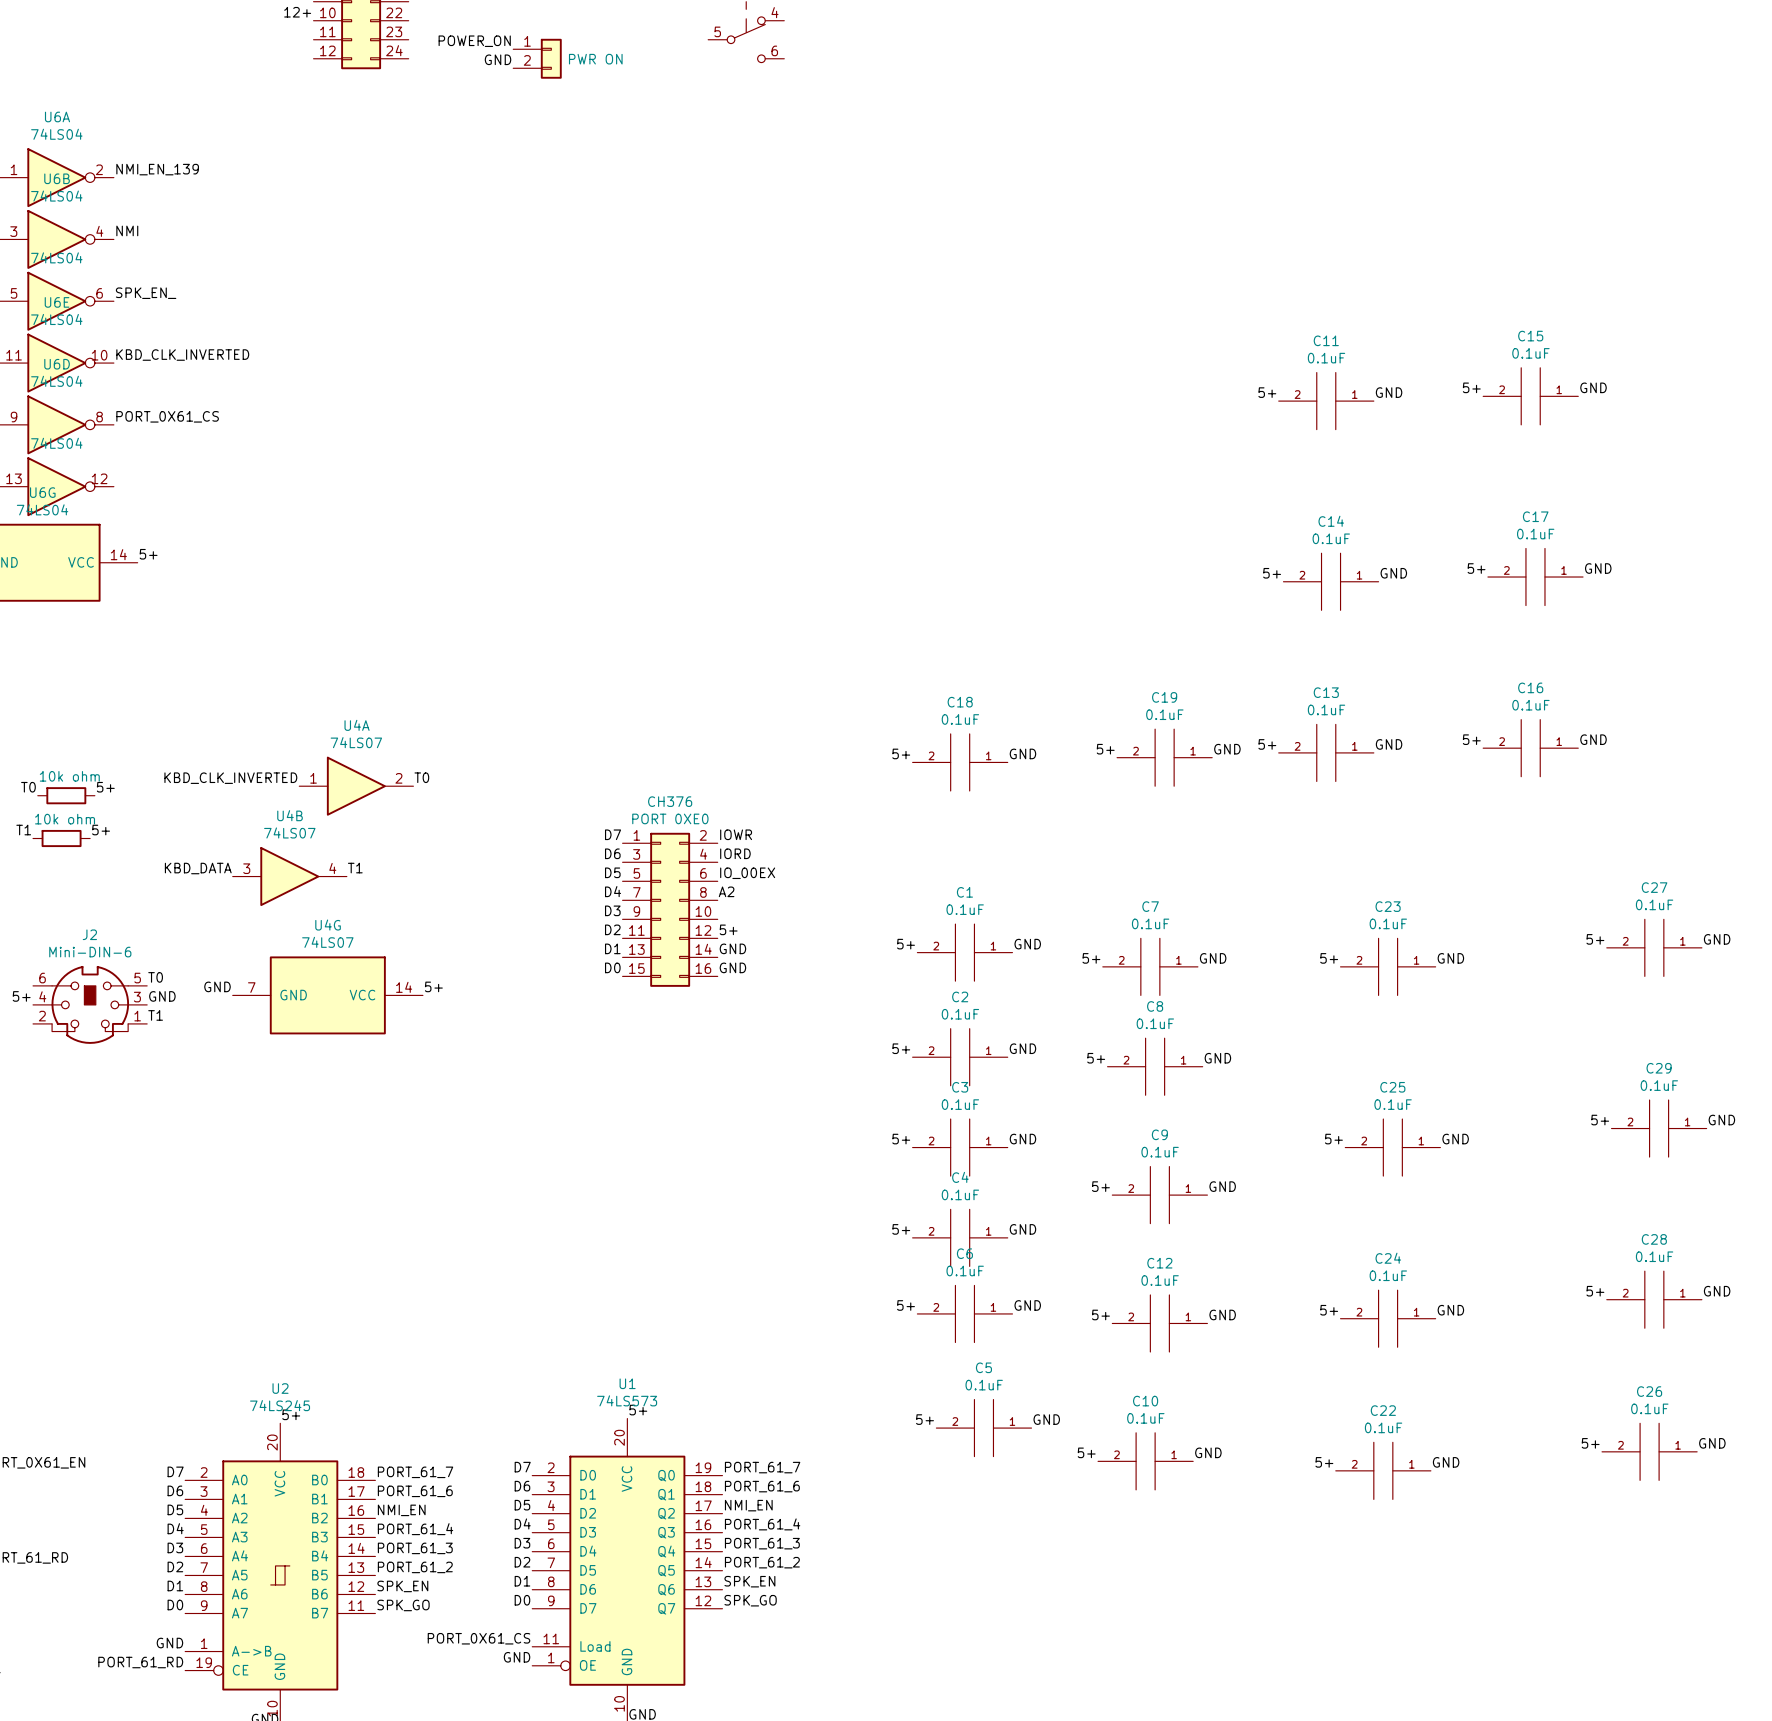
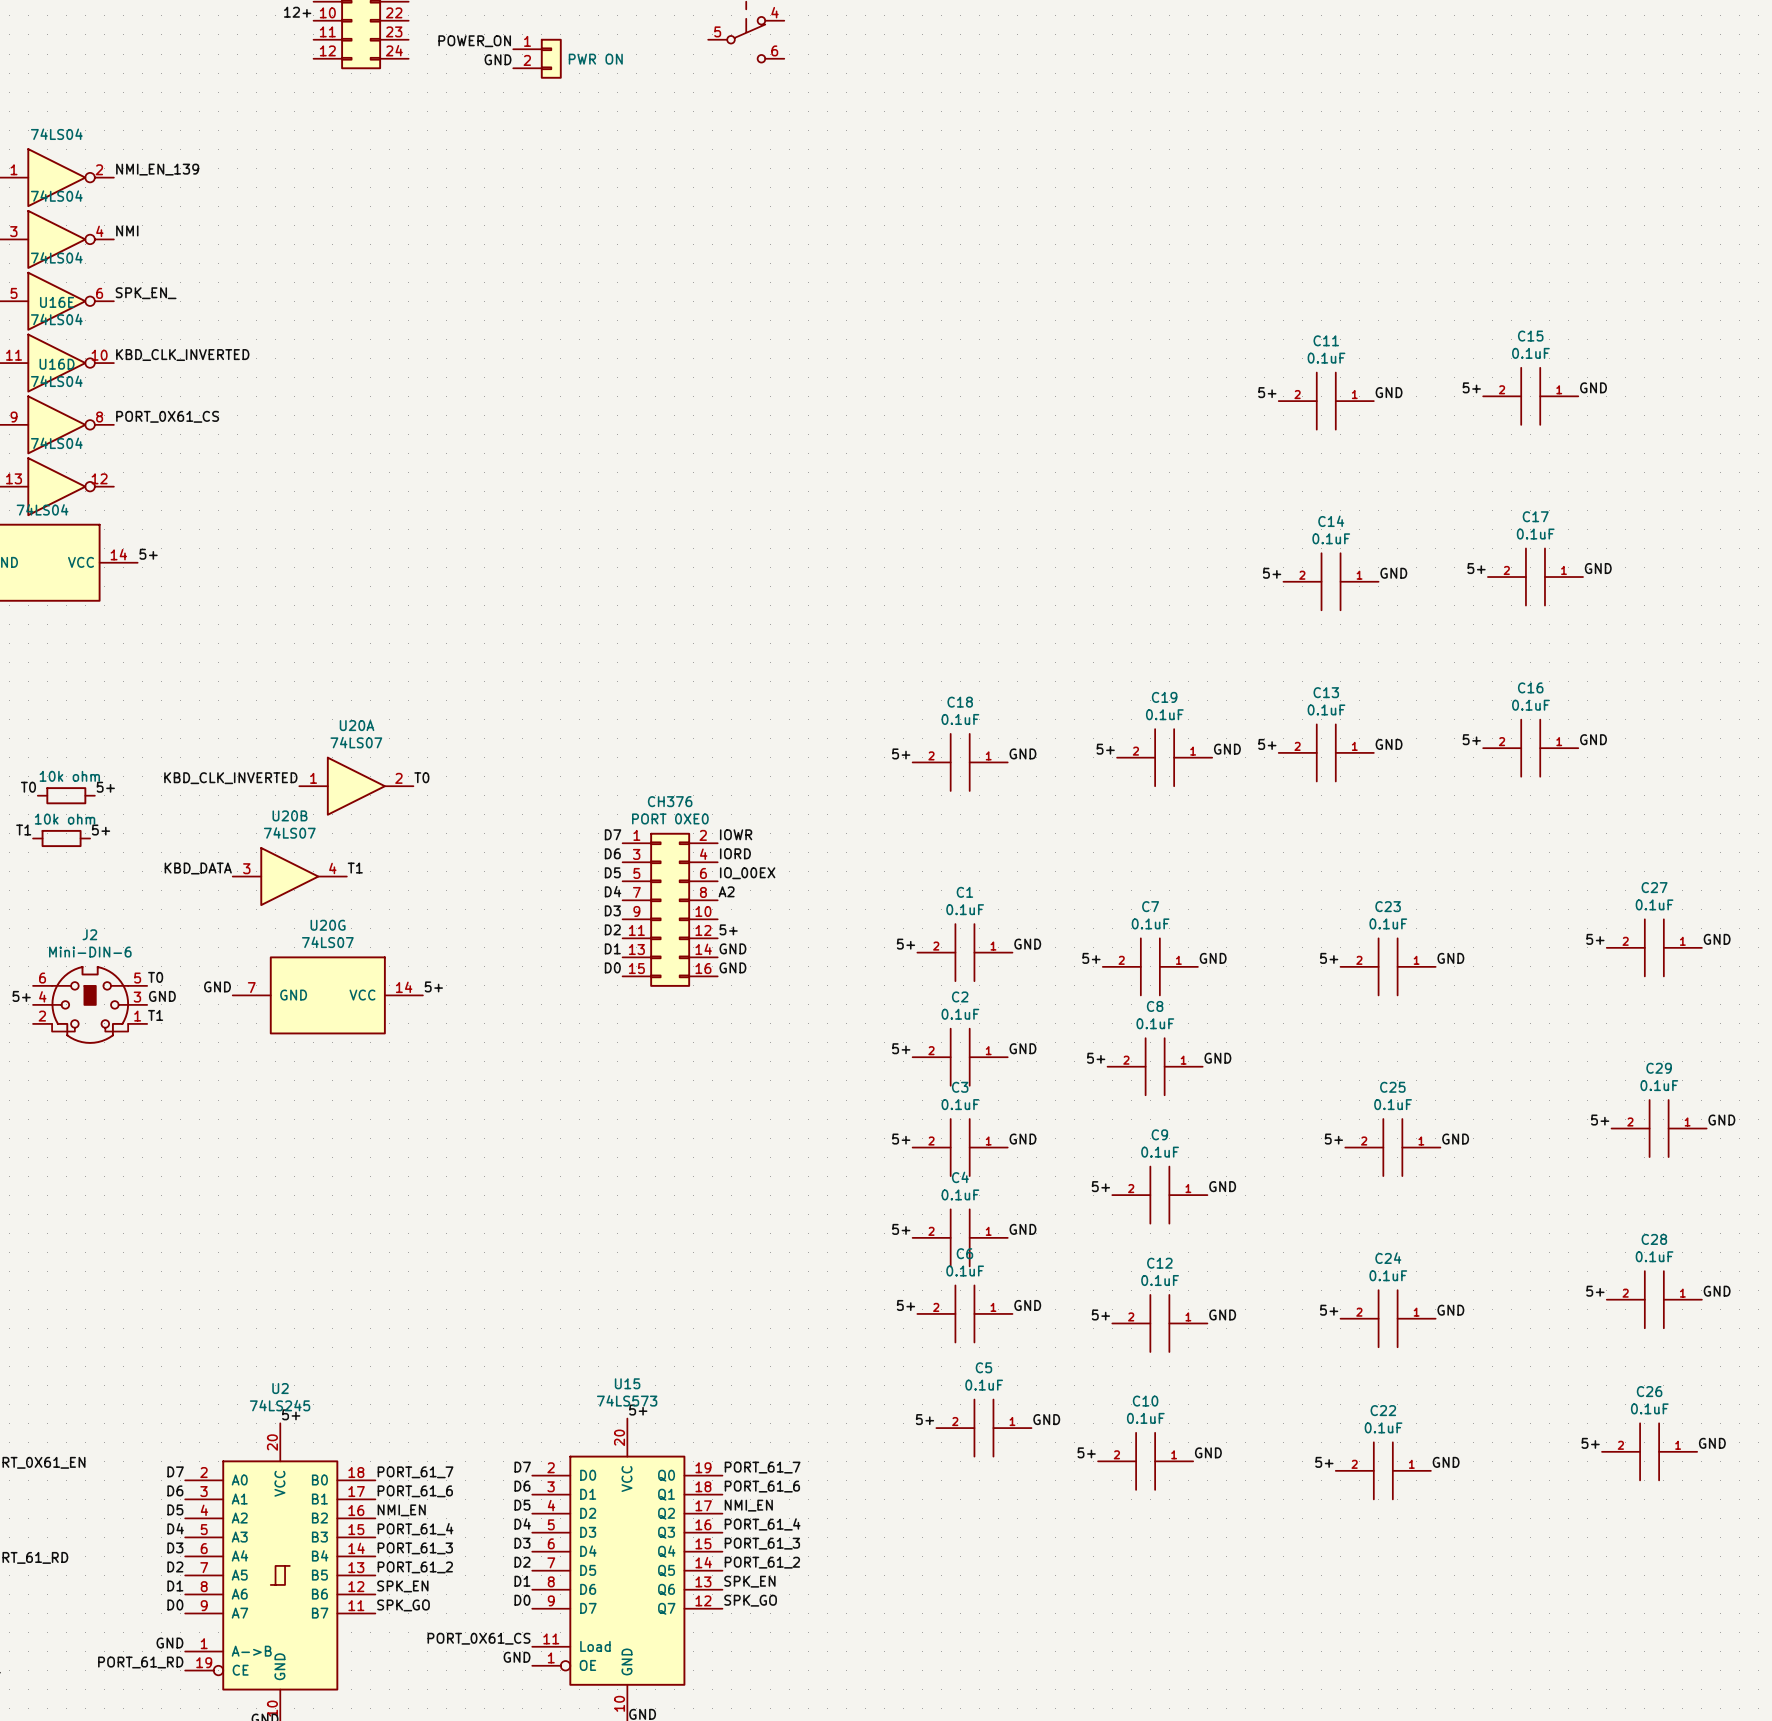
U6A name: U6A (57, 116) -> none
U6B name: U6B (57, 178) -> none
U6E name: U6E (57, 302) -> U16E (57, 302)
U6D name: U6D (57, 364) -> U16D (57, 364)
U6G name: U6G (42, 492) -> none
U4A name: U4A (357, 725) -> U20A (357, 725)
U4B name: U4B (290, 815) -> U20B (290, 815)
U4G name: U4G (328, 925) -> U20G (328, 925)
U1 name: U1 (627, 1383) -> U15 (627, 1383)

